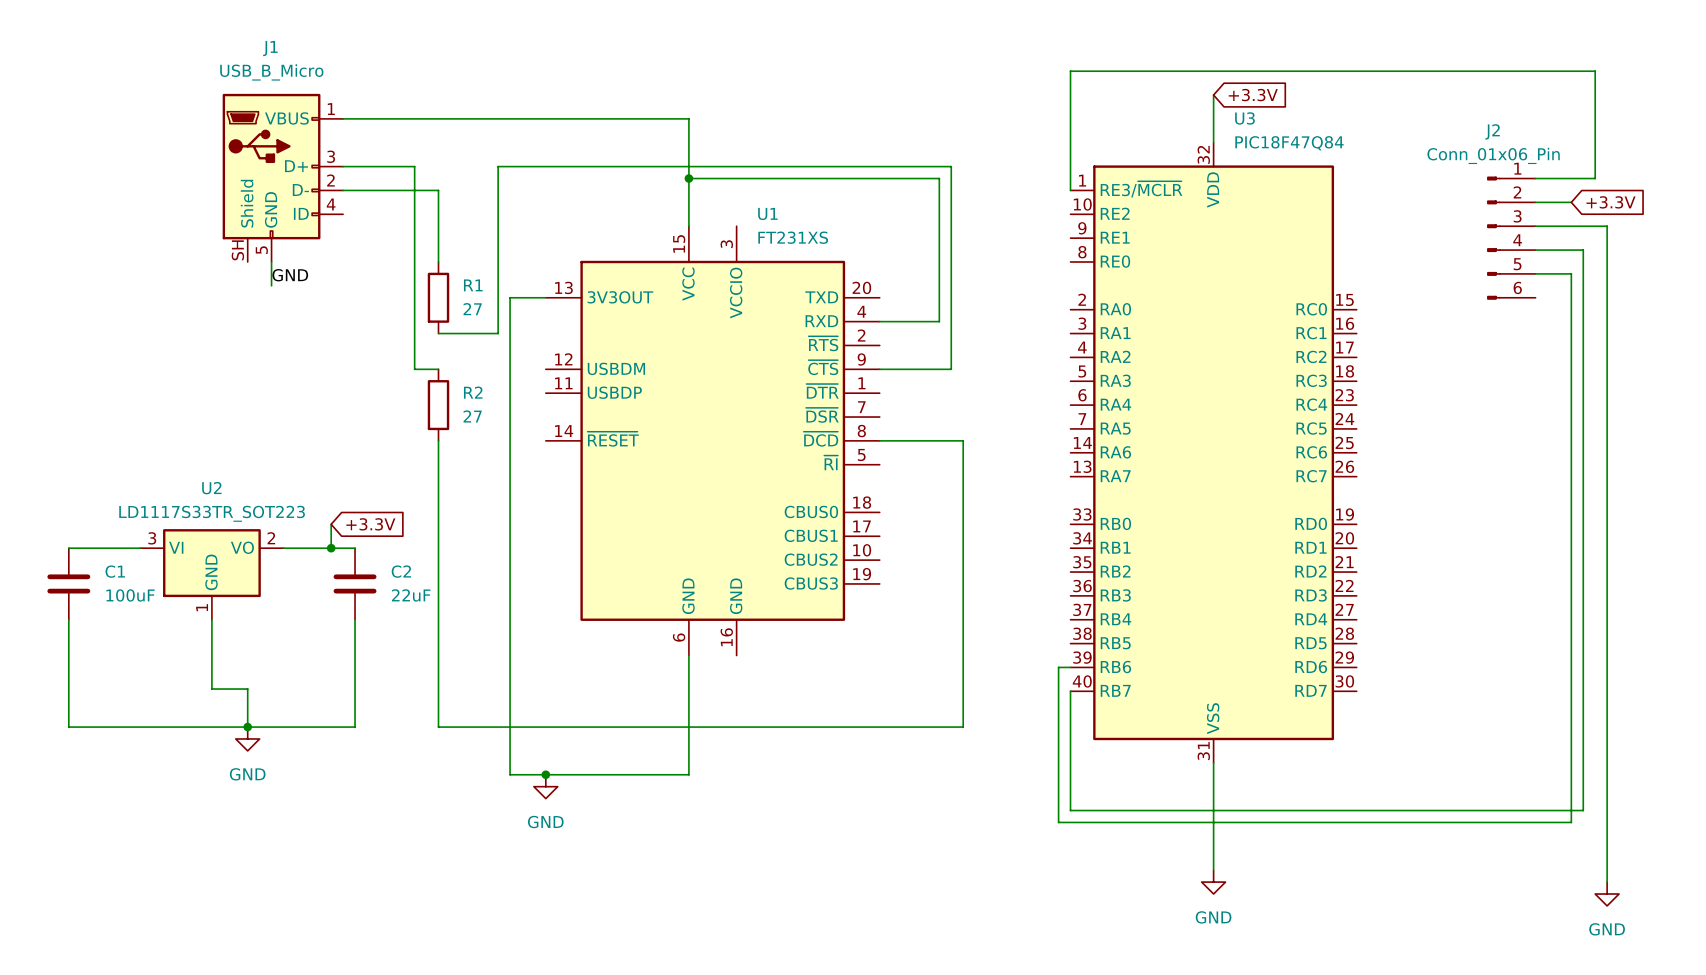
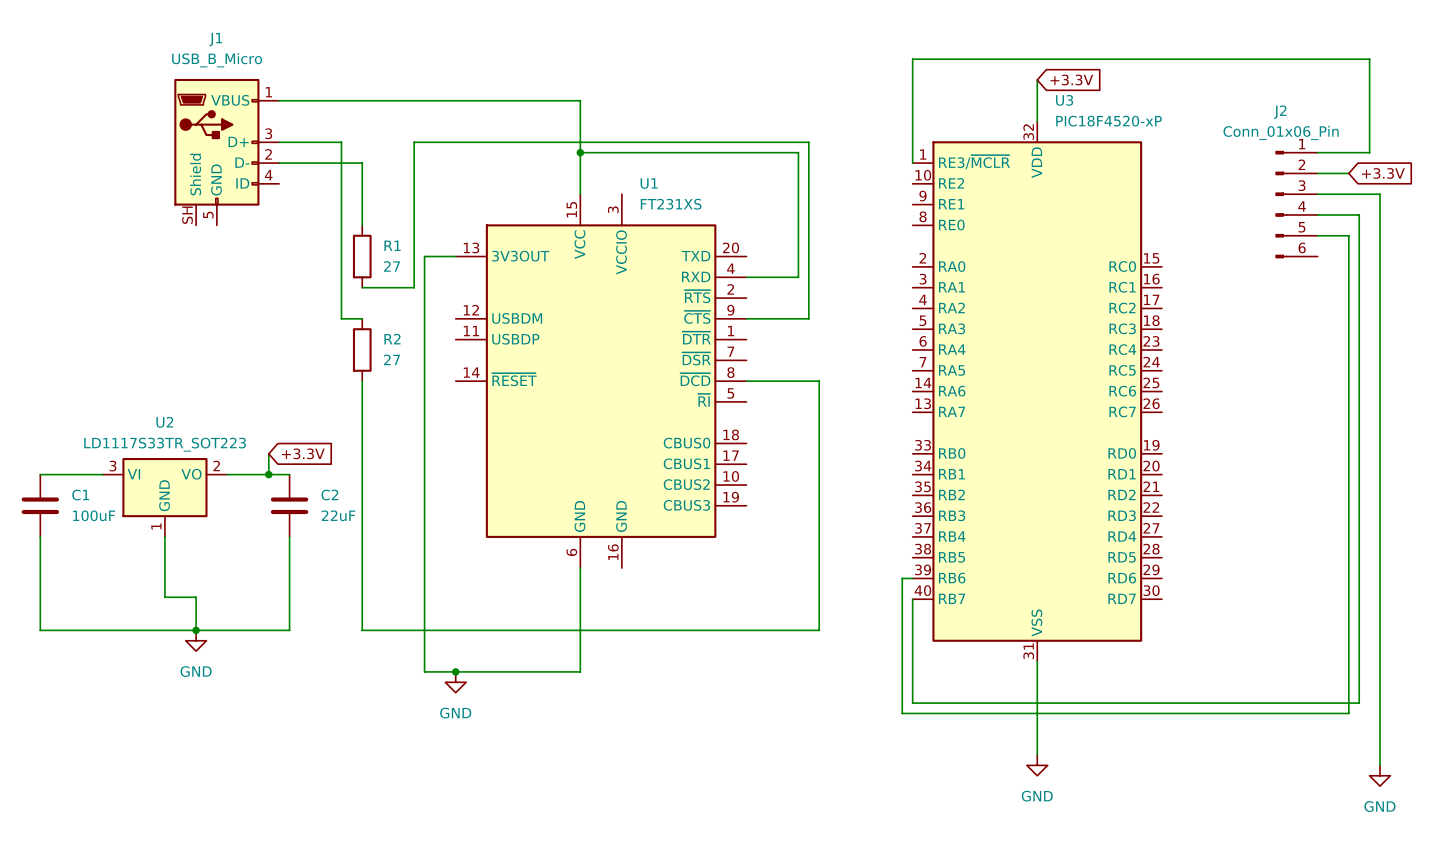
U3 value: PIC18F47Q84 (1289, 143) -> PIC18F4520-xP (1108, 121)
wire: (271, 262) (271, 285) -> none
label: GND (290, 275) -> none

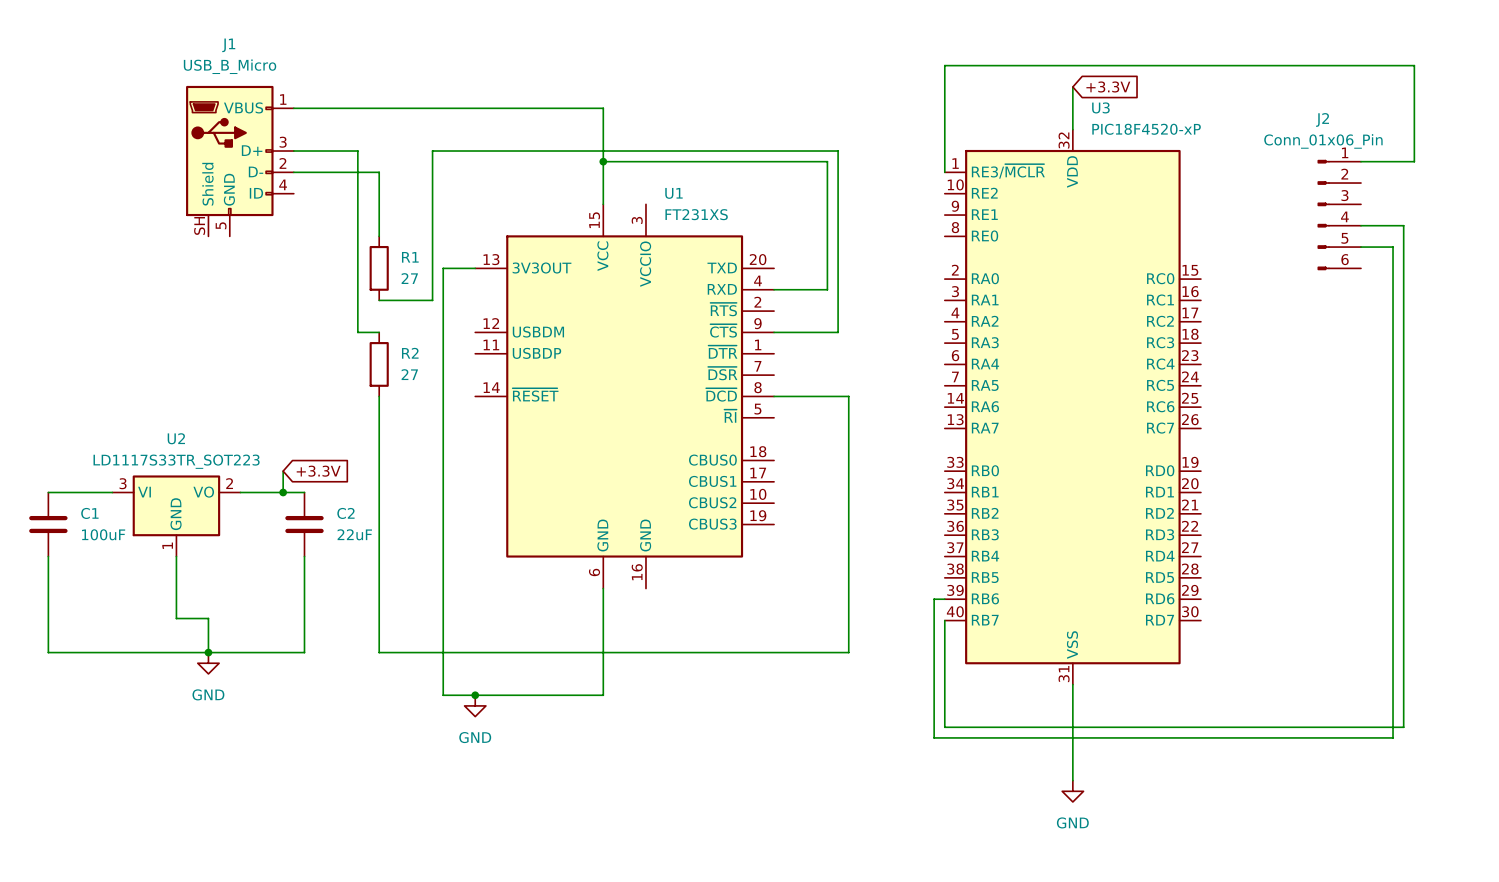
wire: (1317, 173) (1348, 173) -> none
global label: +3.3V (1383, 173) -> none
wire: (1317, 194) (1379, 194) (1379, 765) -> none
power symbol: GND (1379, 775) -> none

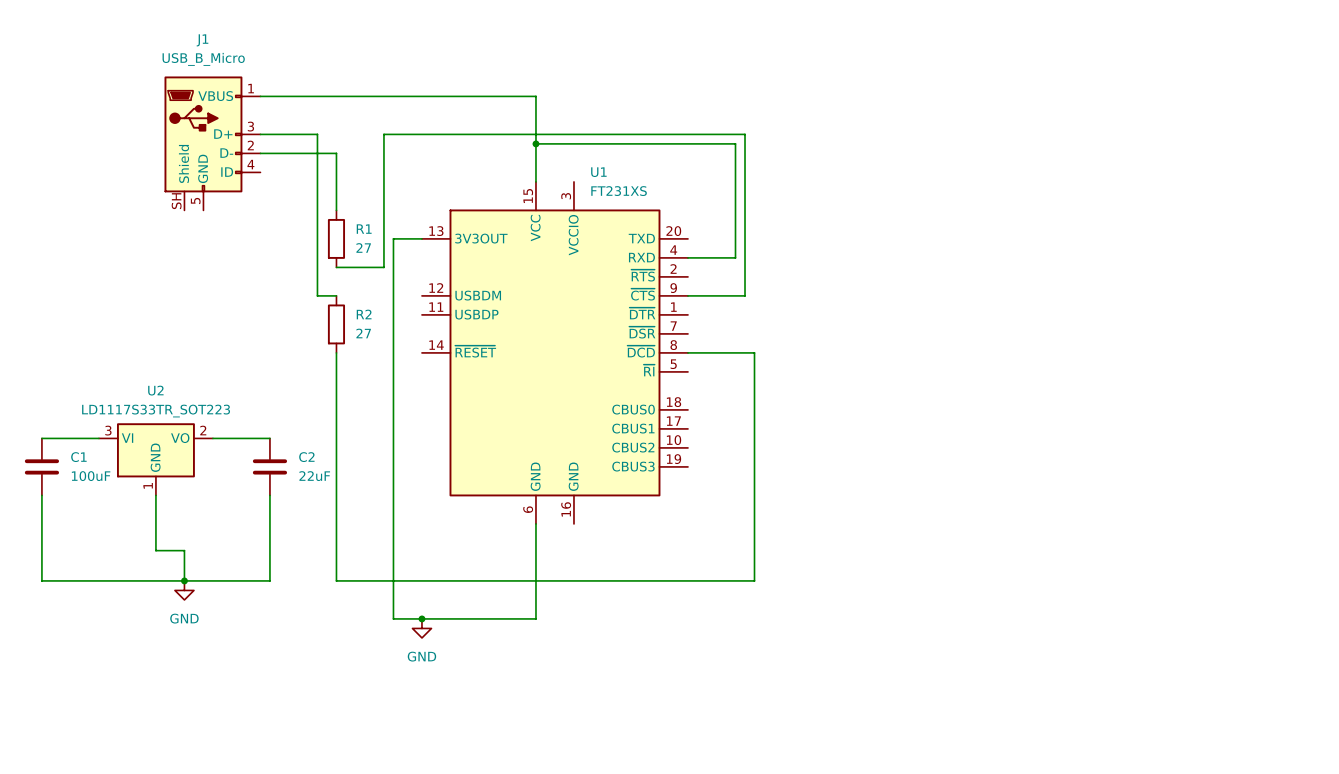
wire: (1072, 86) (1072, 129) -> none
global label: +3.3V (1108, 86) -> none
wire: (1361, 161) (1414, 161) (1414, 65) (944, 65) (944, 172) -> none
J2: Conn_01x06_Pin (1339, 215) -> none
wire: (1361, 225) (1403, 225) (1403, 727) (944, 727) (944, 620) -> none
wire: (1361, 247) (1393, 247) (1393, 737) (934, 737) (934, 599) (944, 599) -> none
U3: PIC18F4520-xP (1072, 407) -> none
wire: (283, 471) (283, 492) -> none
global label: +3.3V (318, 471) -> none
junction: (283, 492) -> none
wire: (1072, 684) (1072, 780) -> none
power symbol: GND (1072, 791) -> none

